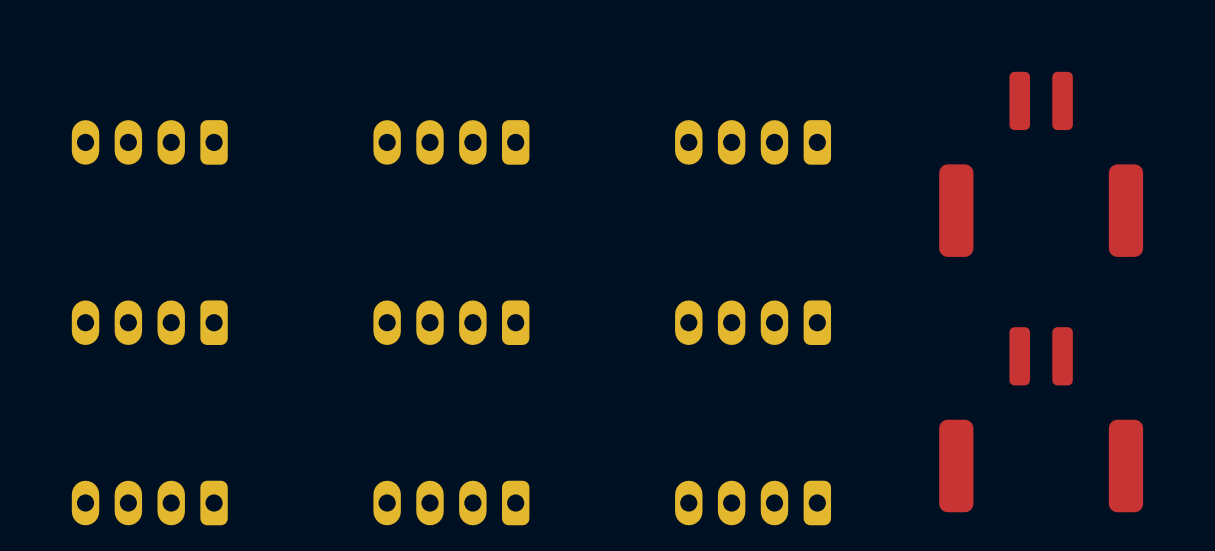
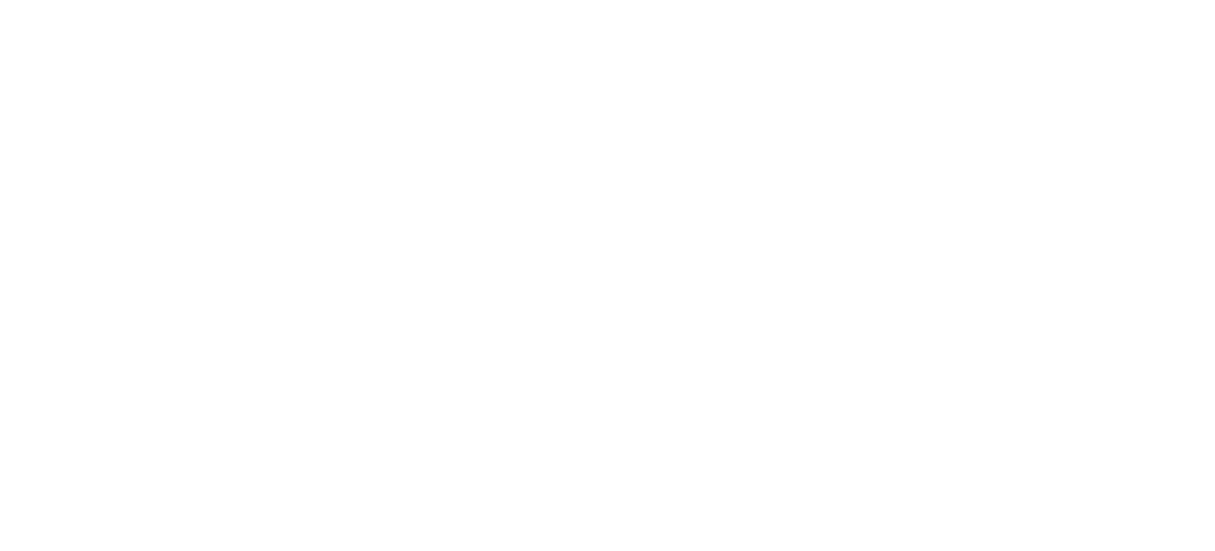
part: (149, 142) -> none
part: (451, 142) -> none
part: (753, 142) -> none
part: (1041, 164) -> none
part: (149, 322) -> none
part: (451, 322) -> none
part: (753, 322) -> none
part: (1041, 419) -> none
part: (149, 503) -> none
part: (451, 503) -> none
part: (753, 503) -> none

